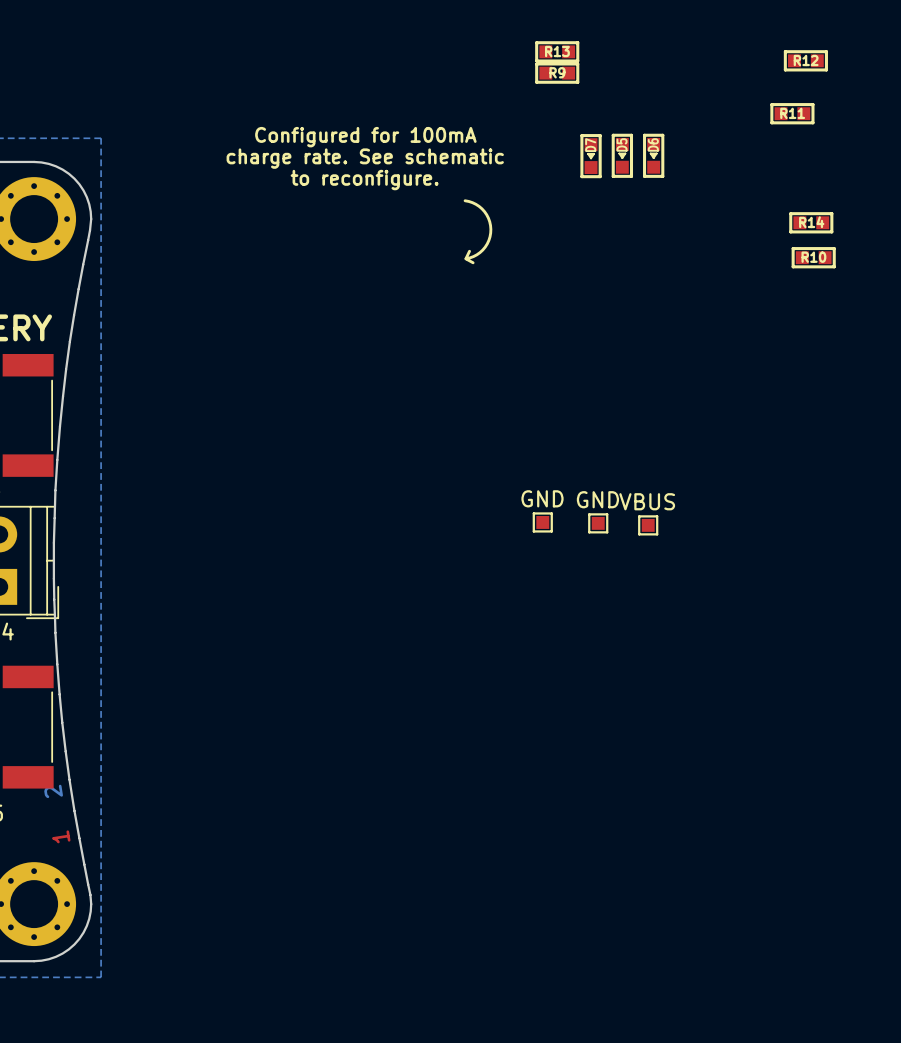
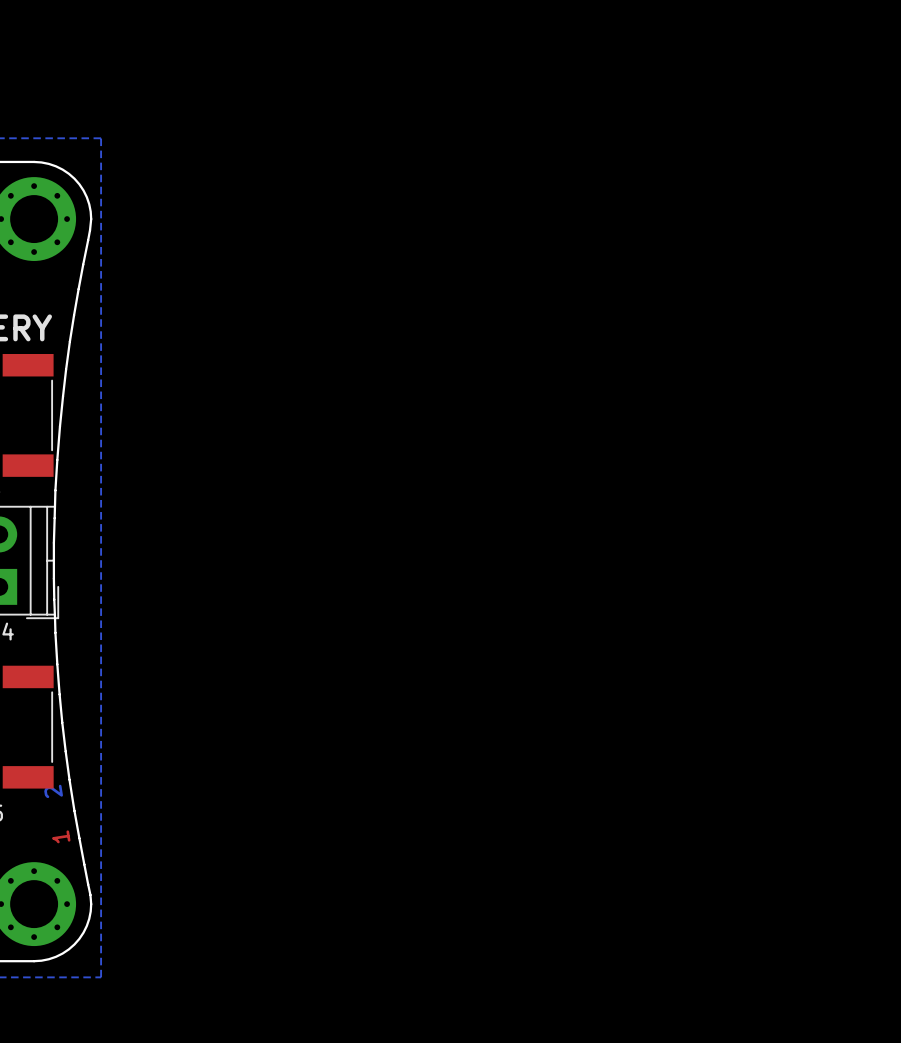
R13: (557, 51) -> none
R12: (805, 60) -> none
R9: (557, 73) -> none
R11: (792, 113) -> none
text: Configured for 100mA (365, 137) -> none
D5: (622, 155) -> none
D6: (653, 155) -> none
D7: (591, 156) -> none
text: charge rate. See schematic (365, 158) -> none
text: to reconfigure. (364, 180) -> none
line: (465, 200) (475, 204) (484, 211) (490, 229) (488, 240) (482, 250) (466, 258) -> none
R14: (811, 222) -> none
line: (469, 251) (465, 258) -> none
R10: (813, 257) -> none
line: (466, 258) (473, 262) -> none
GND: (542, 522) -> none
GND: (598, 523) -> none
VBUS: (648, 525) -> none

